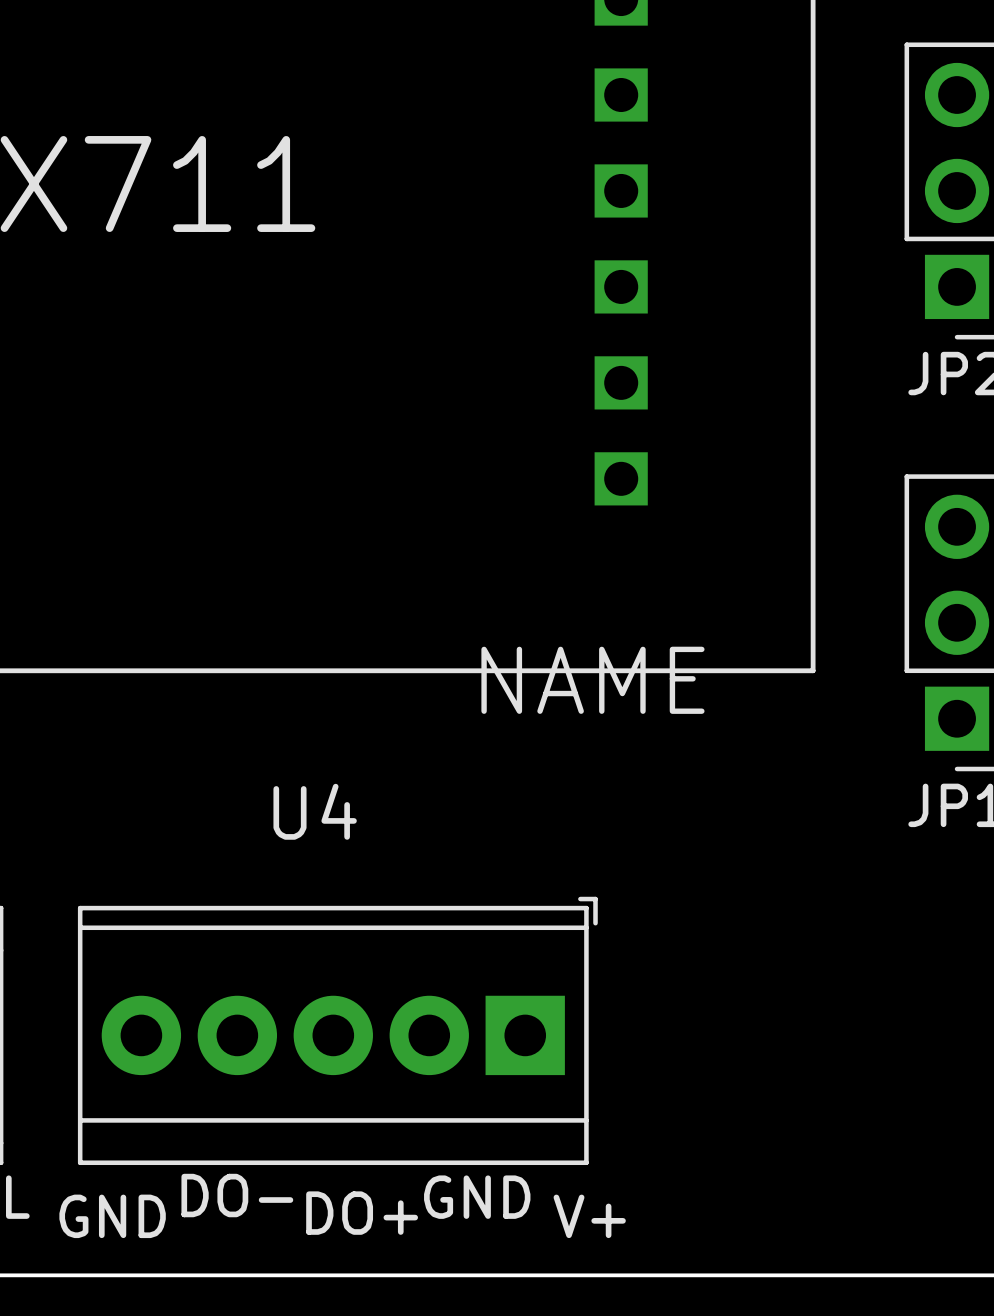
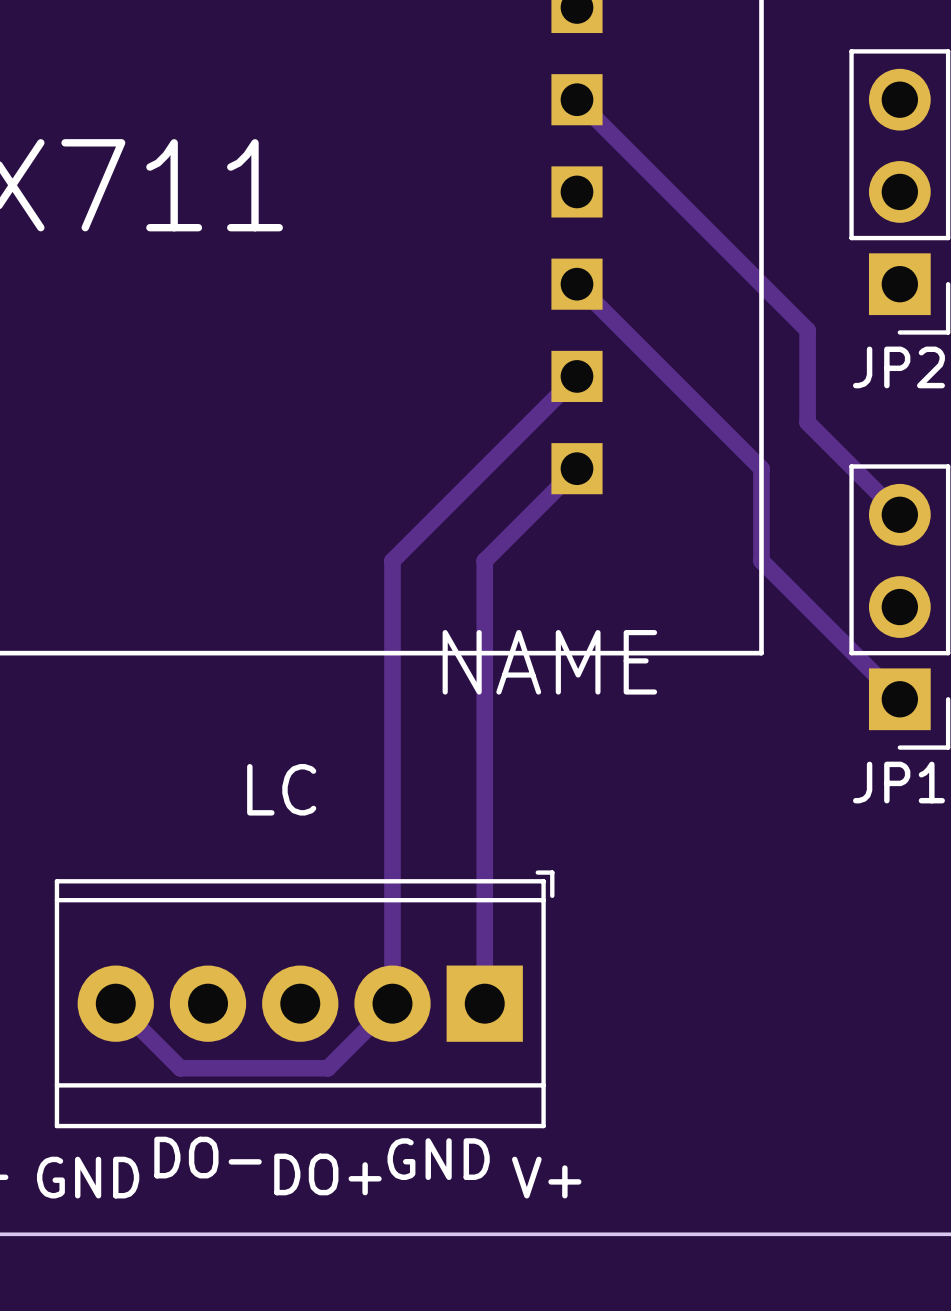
track: none -> (576, 99) (807, 330) (807, 422) (899, 514)
track: none -> (576, 284) (761, 468) (761, 560) (899, 699)
track: none -> (576, 376) (392, 560) (392, 1003) (327, 1068) (180, 1068) (115, 1003)
track: none -> (576, 468) (484, 560) (484, 1003)
U4 name: U4 (315, 811) -> LC (281, 789)

